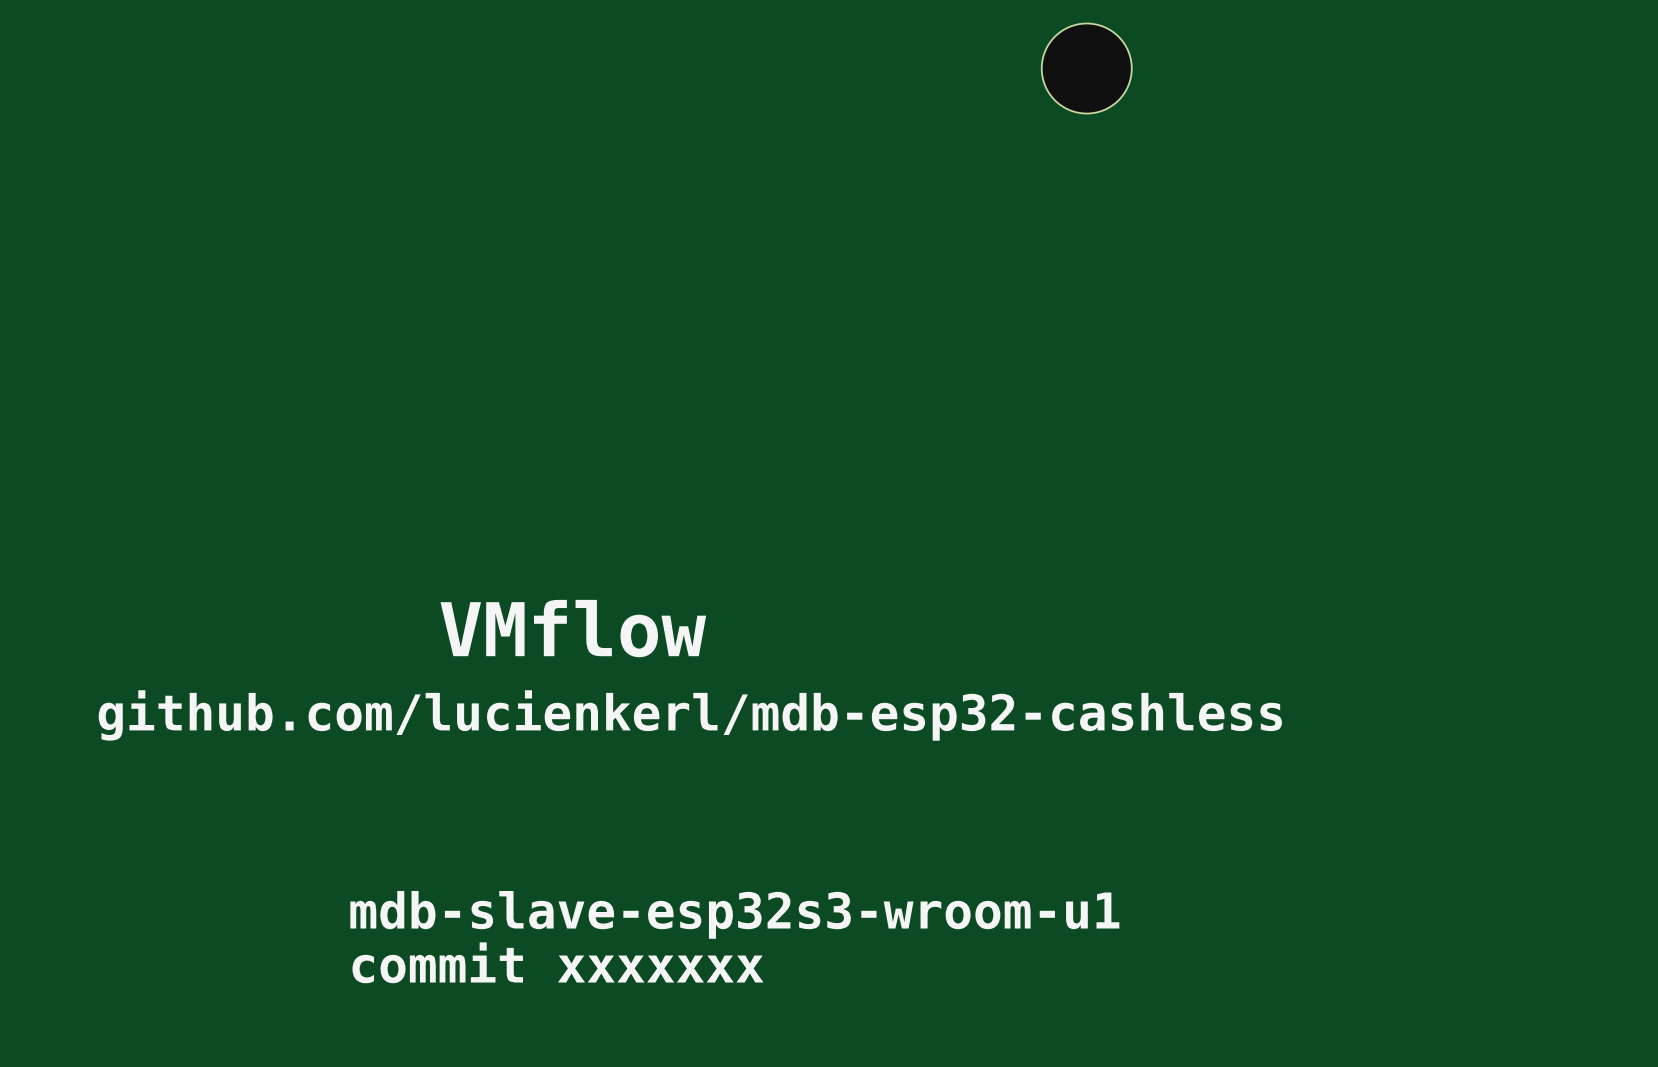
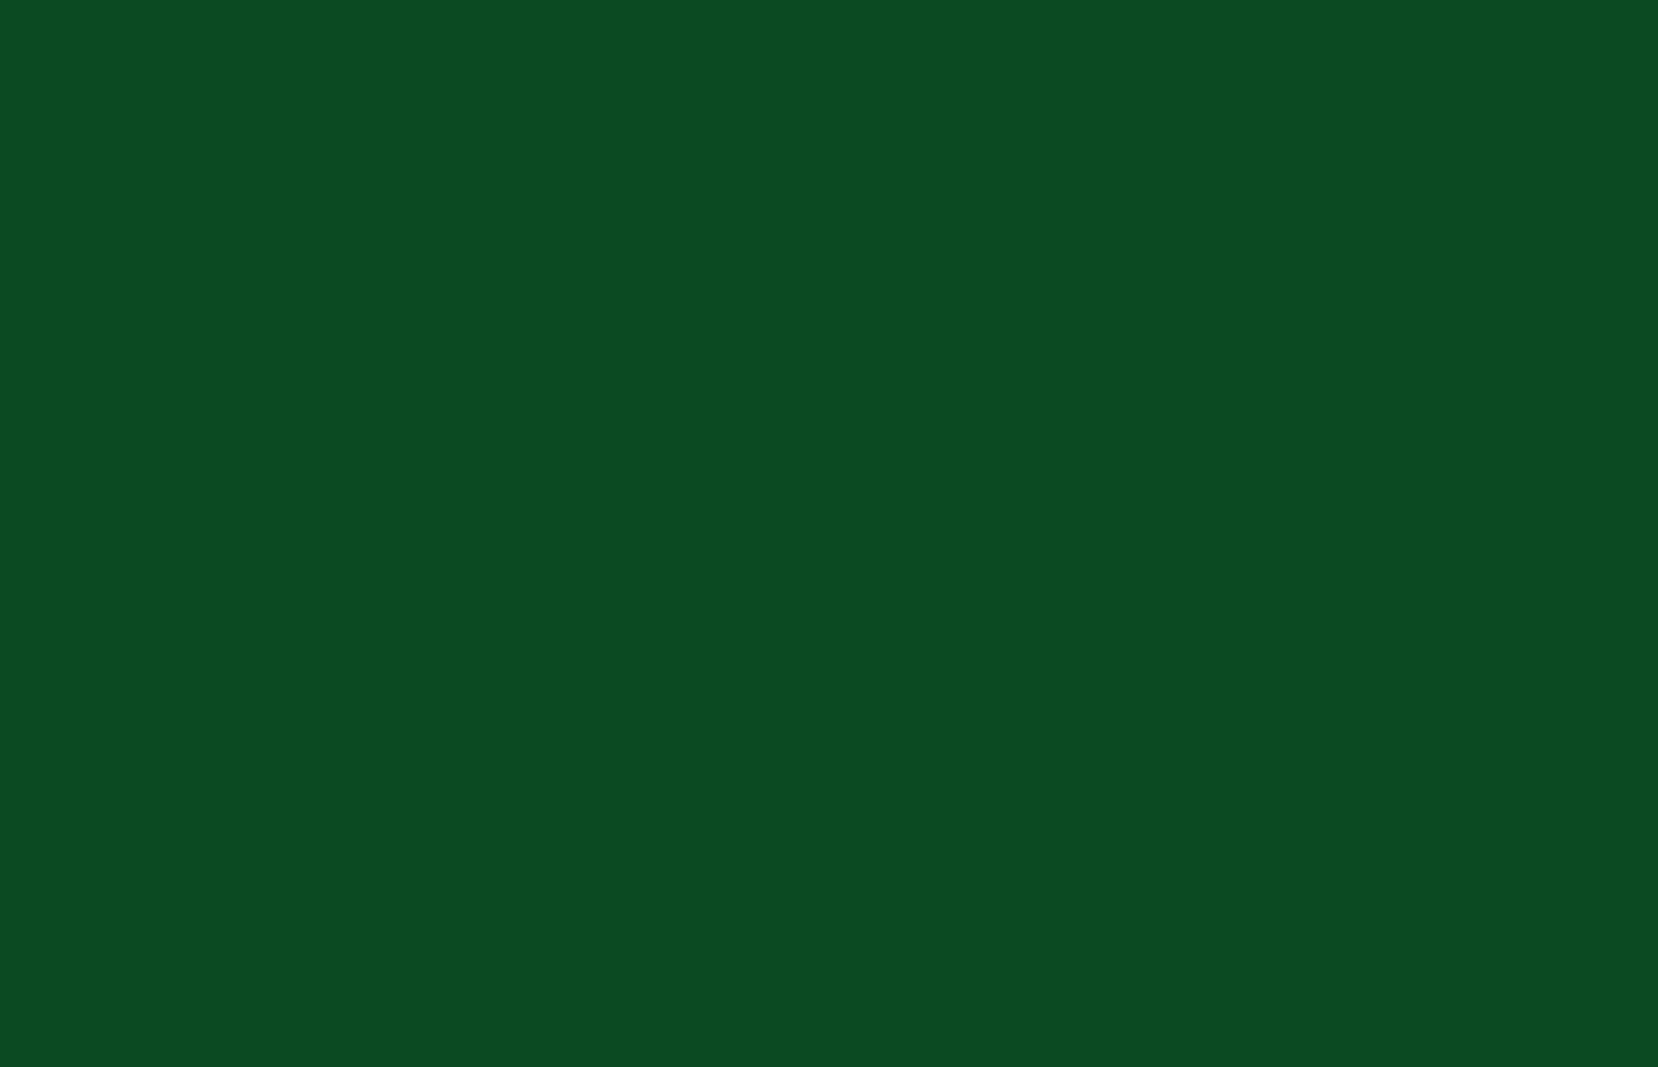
part: (1086, 68) -> none
text: VMflow (573, 628) -> none
text: github.com/lucienkerl/mdb-esp32-cashless (690, 715) -> none
text: mdb-slave-esp32s3-wroom-u1 (734, 914) -> none
text: commit xxxxxxx (557, 962) -> none

